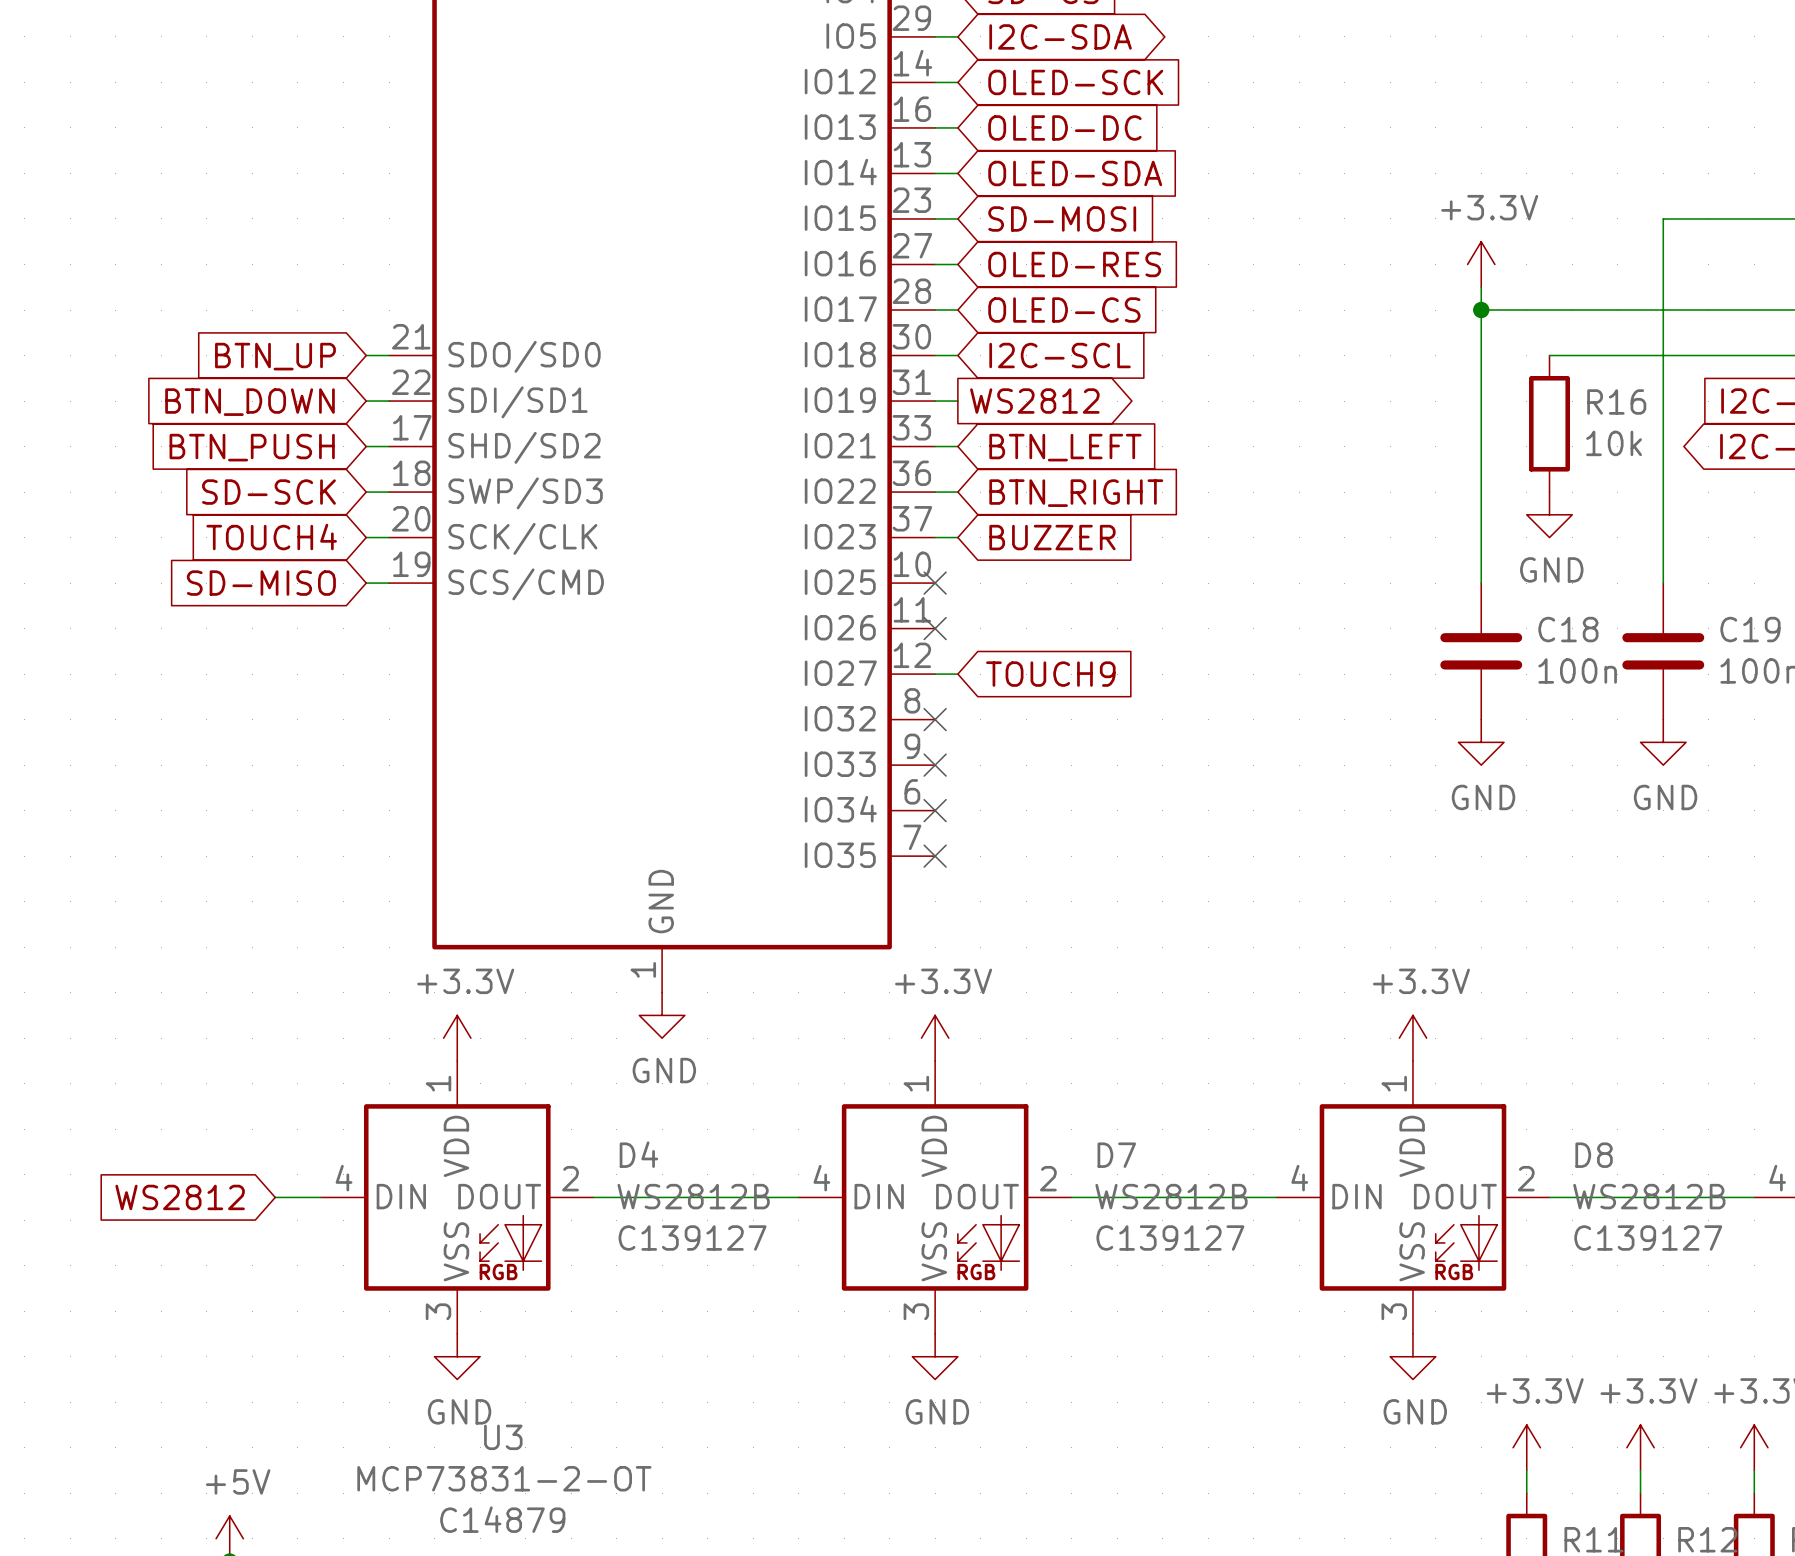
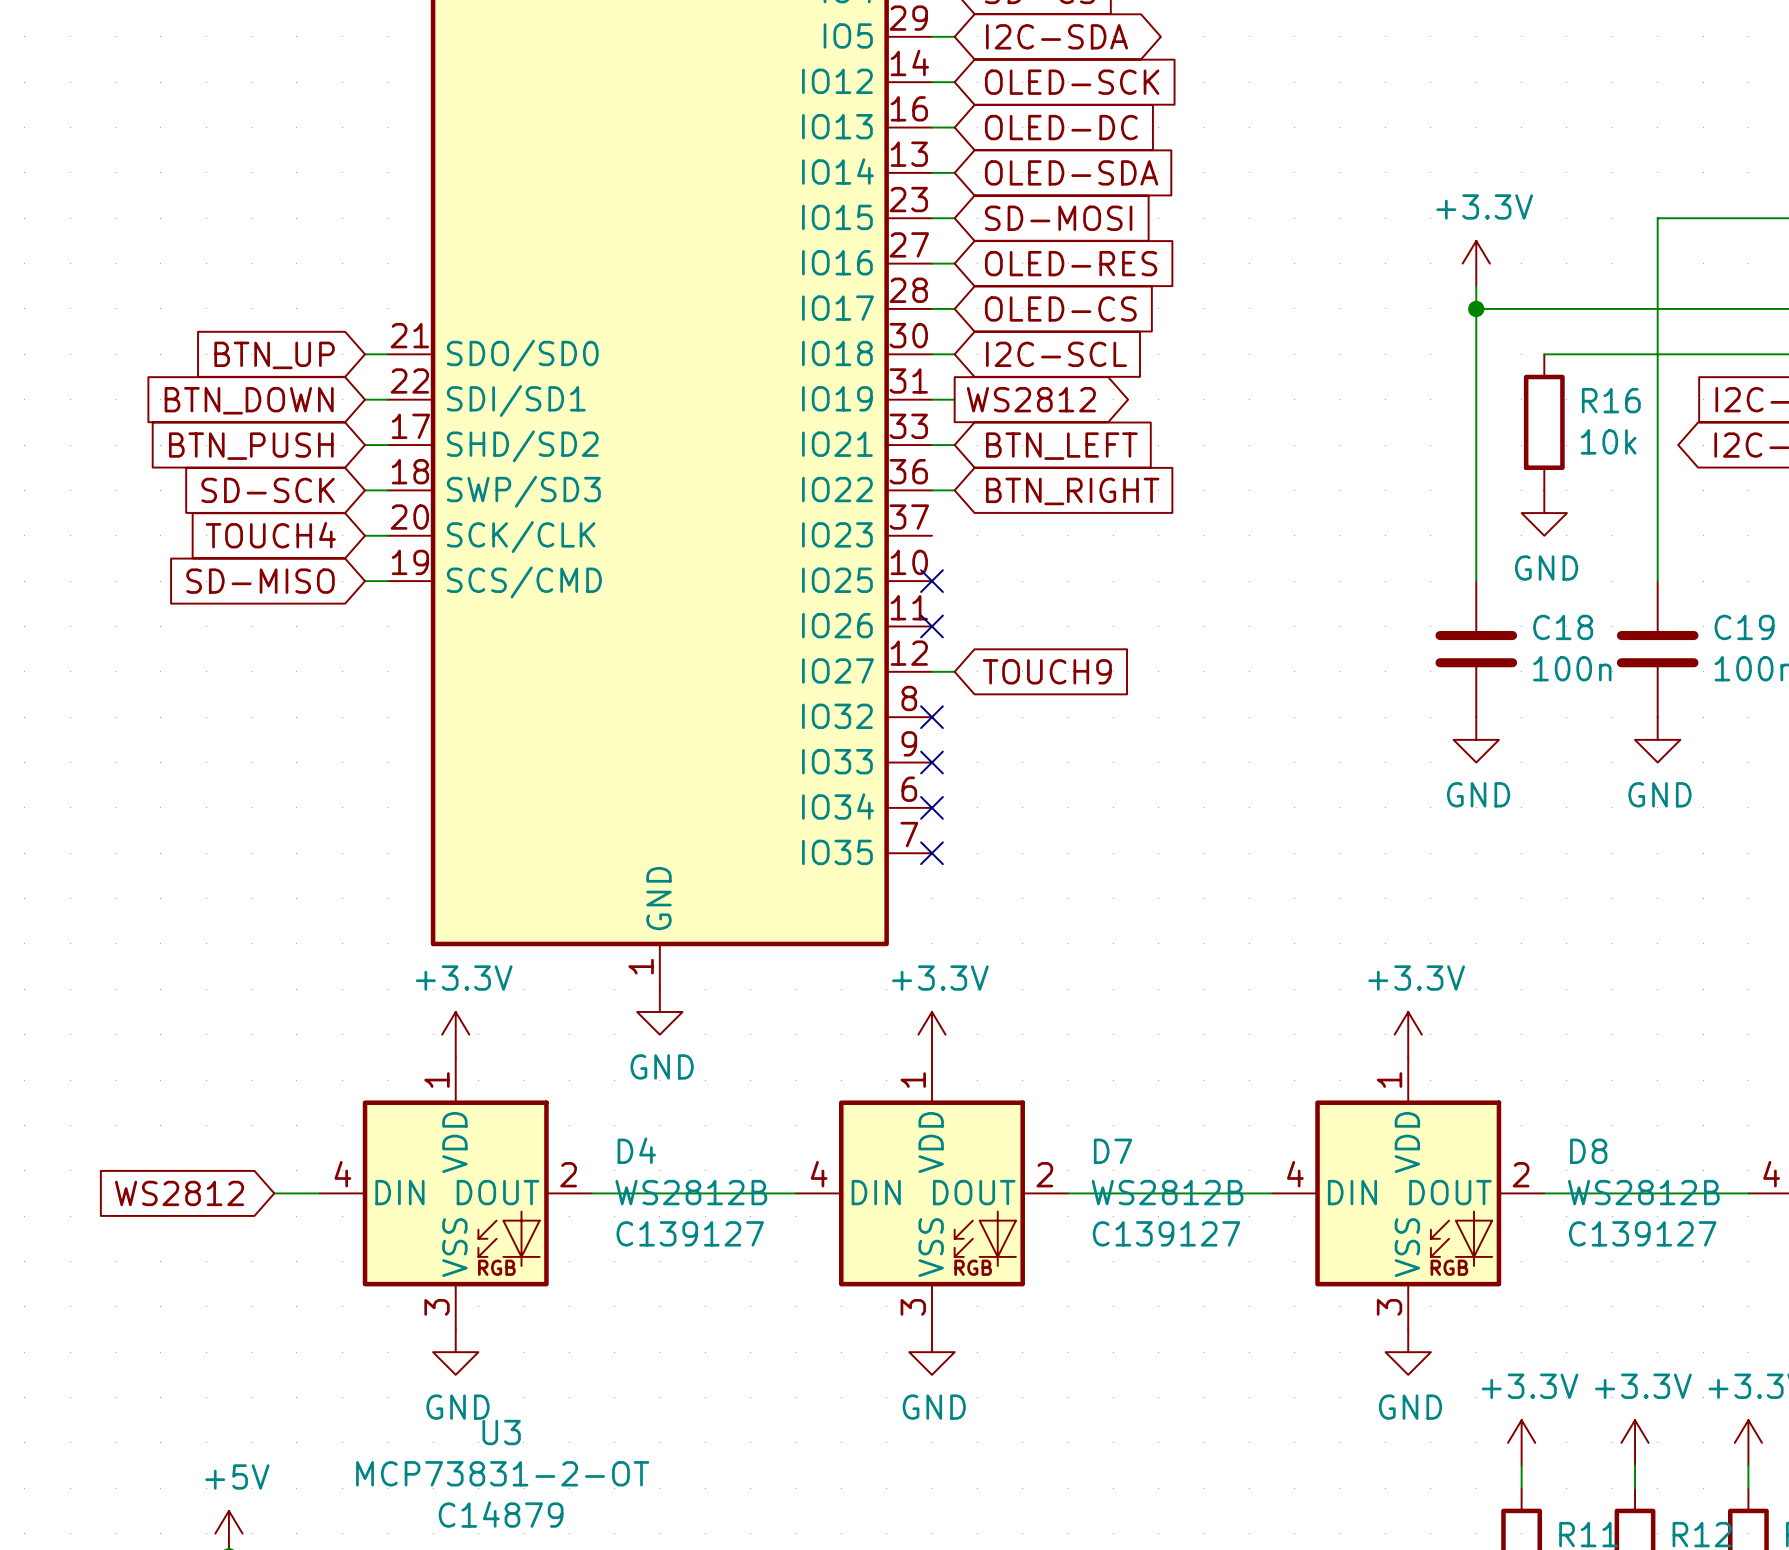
wire: (935, 537) (957, 537) -> none
global label: BUZZER (1052, 537) -> none

